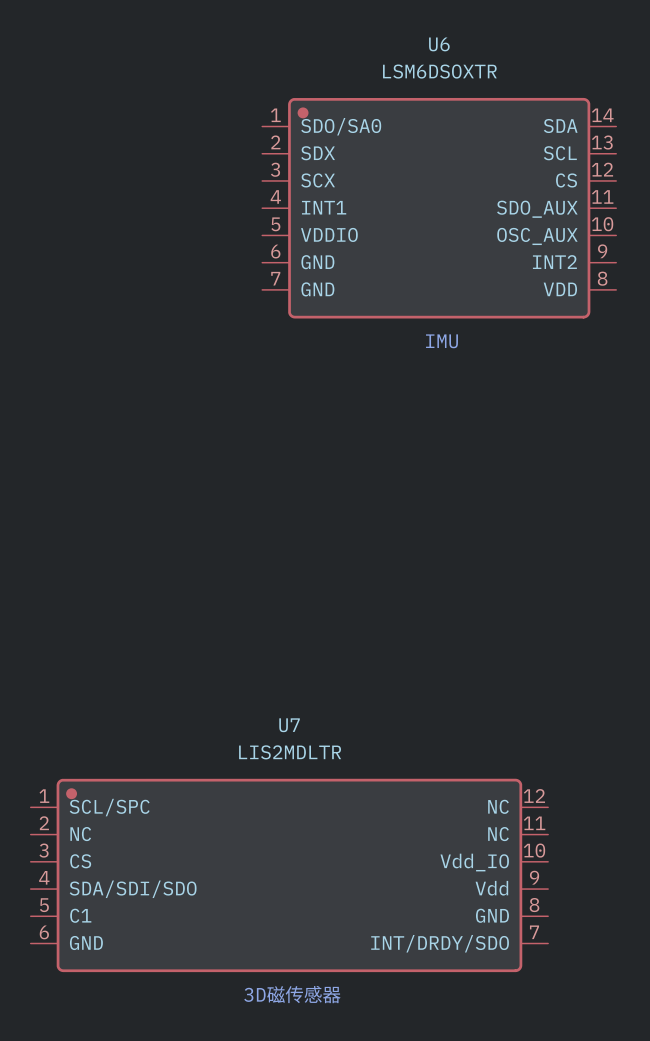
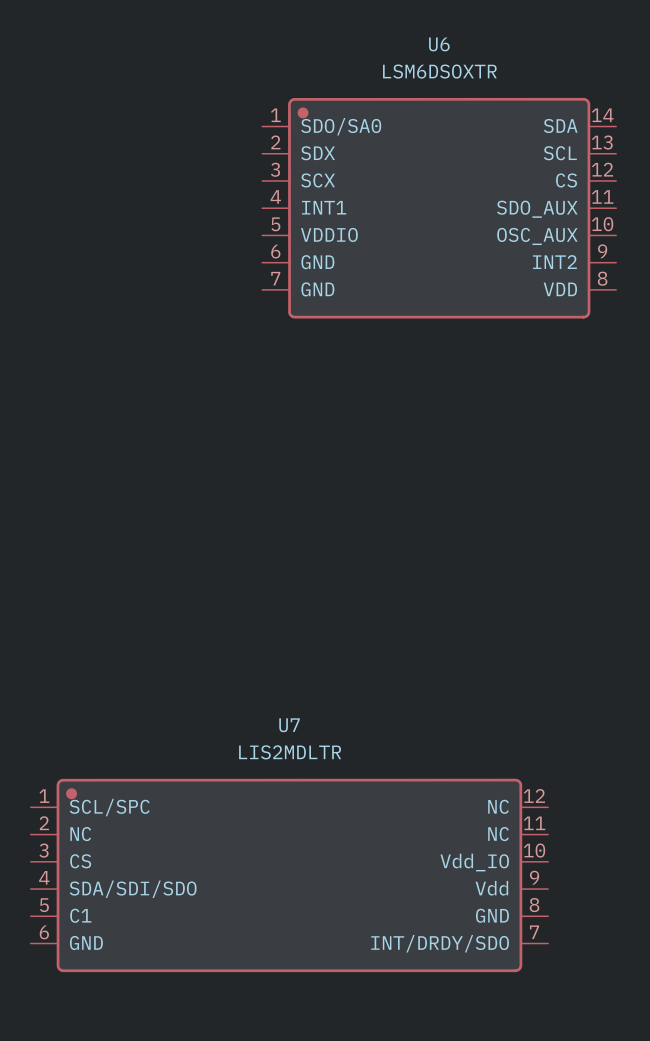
text: IMU (441, 341) -> none
text: 3D磁传感器 (292, 994) -> none

